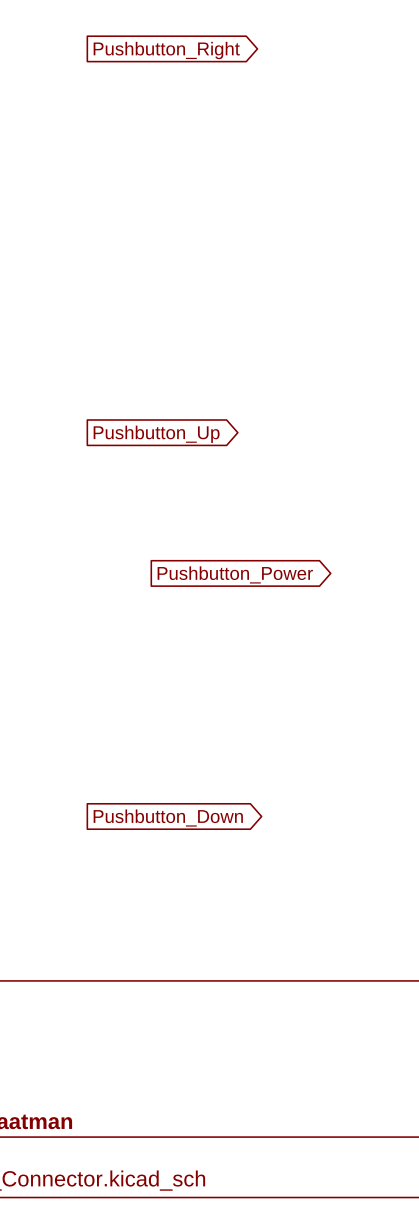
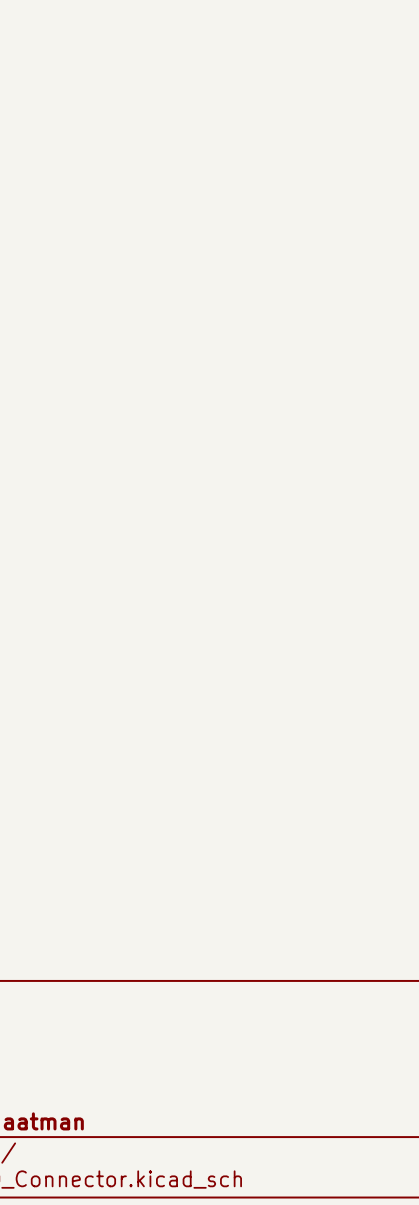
global label: Pushbutton_Right (166, 50) -> none
global label: Pushbutton_Up (156, 434) -> none
global label: Pushbutton_Power (235, 574) -> none
global label: Pushbutton_Down (168, 818) -> none

